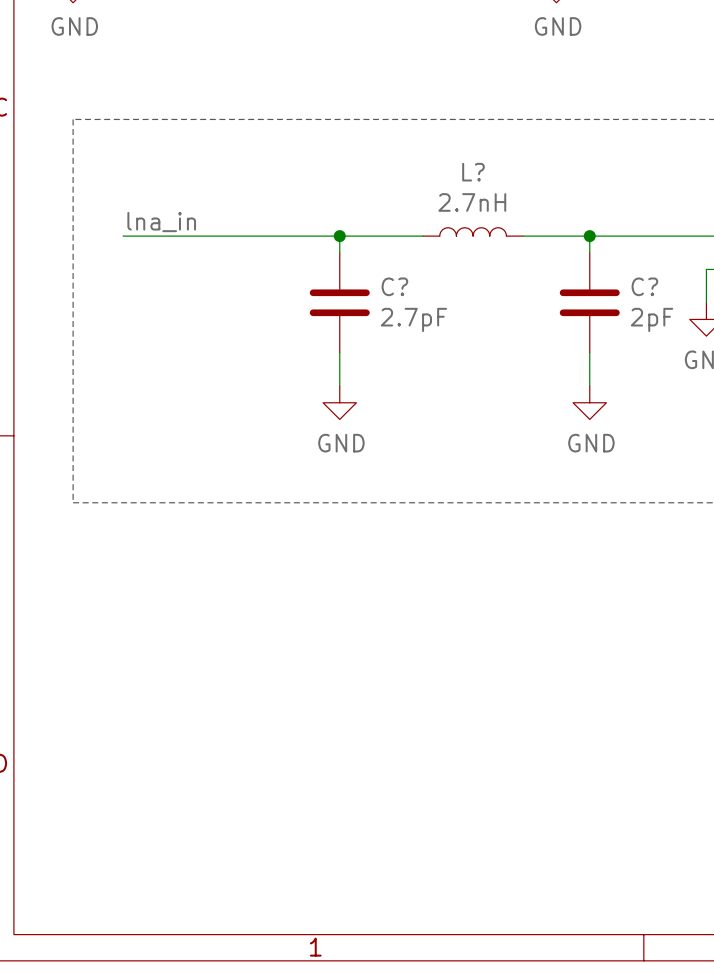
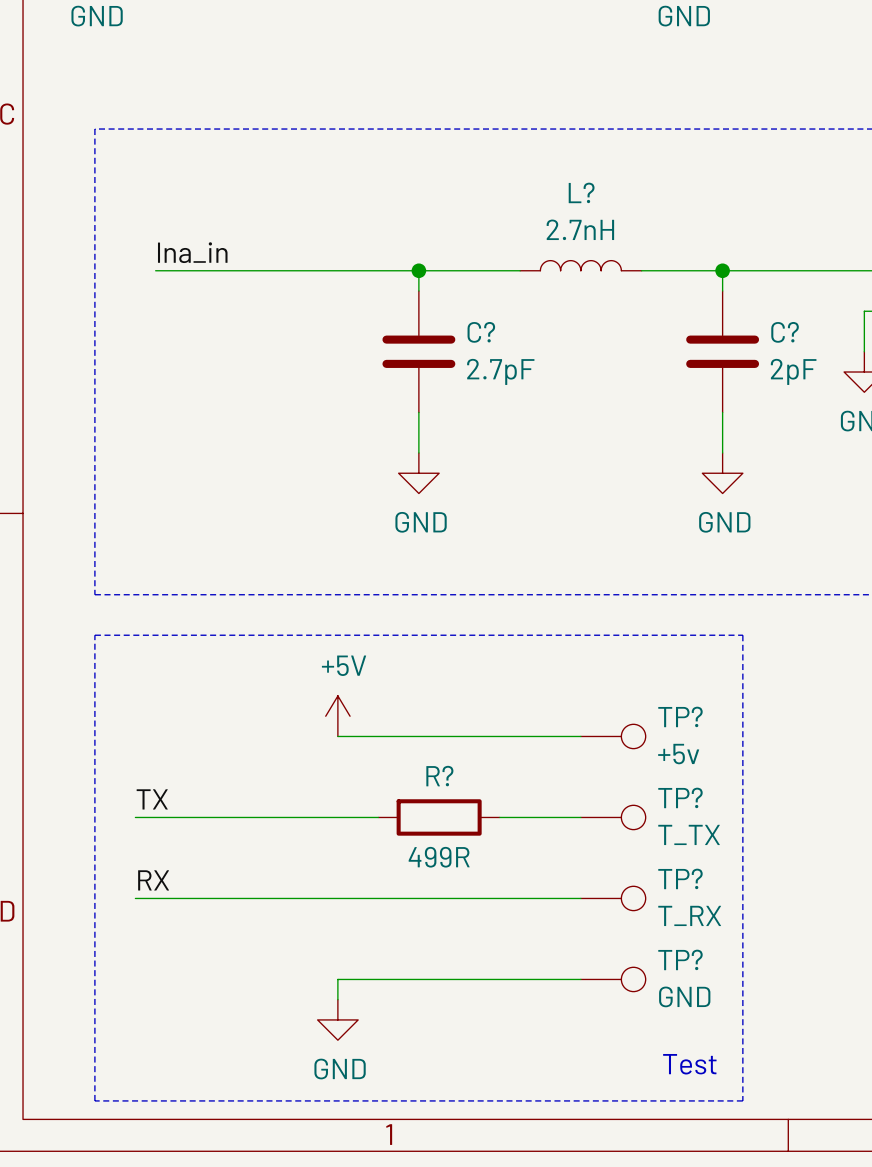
line: none -> (94, 635) (742, 635) (742, 1100) (94, 1100) (94, 635)
power symbol: none -> +5V (337, 716)
wire: none -> (337, 736) (580, 736)
TP?: none -> +5v (613, 736)
label: none -> TX (152, 799)
wire: none -> (135, 817) (378, 817)
R?: none -> 499R (439, 817)
wire: none -> (499, 817) (580, 817)
TP?: none -> T_TX (613, 817)
label: none -> RX (153, 880)
wire: none -> (135, 898) (580, 898)
TP?: none -> T_RX (613, 898)
wire: none -> (580, 979) (337, 979) (337, 999)
TP?: none -> GND (613, 979)
power symbol: none -> GND (337, 1019)
text: none -> Test (689, 1064)

